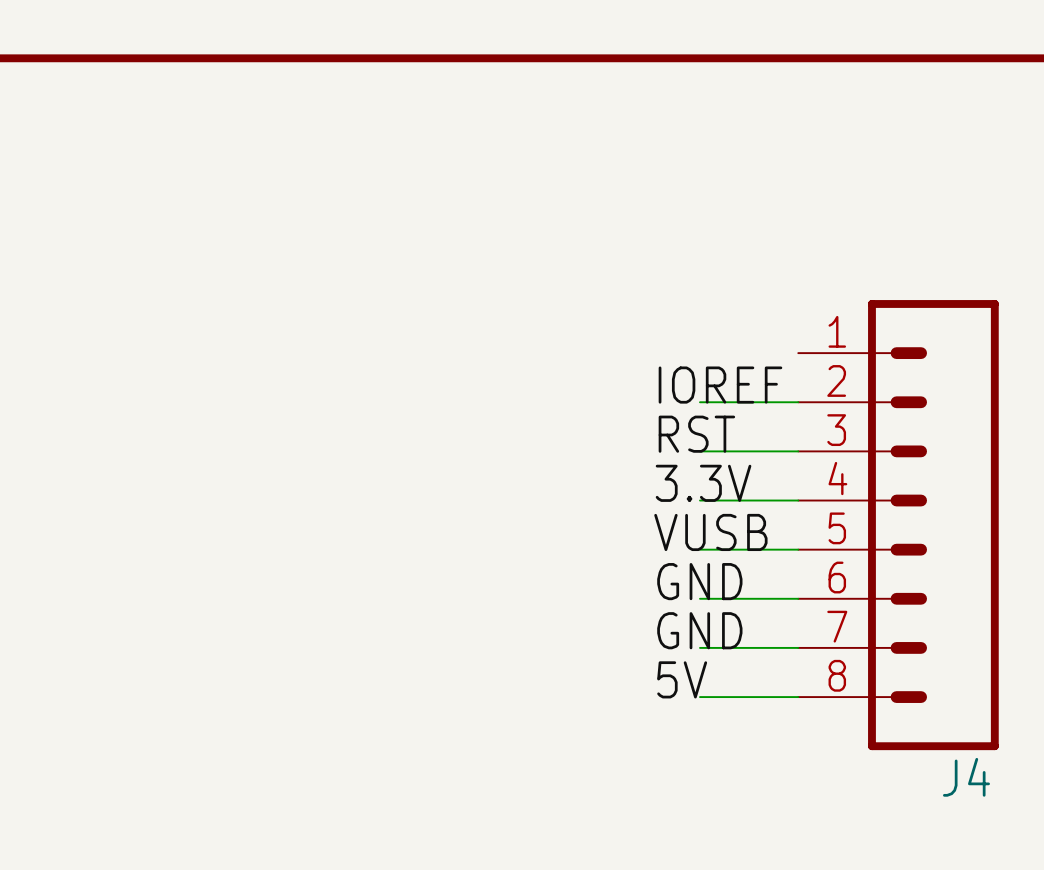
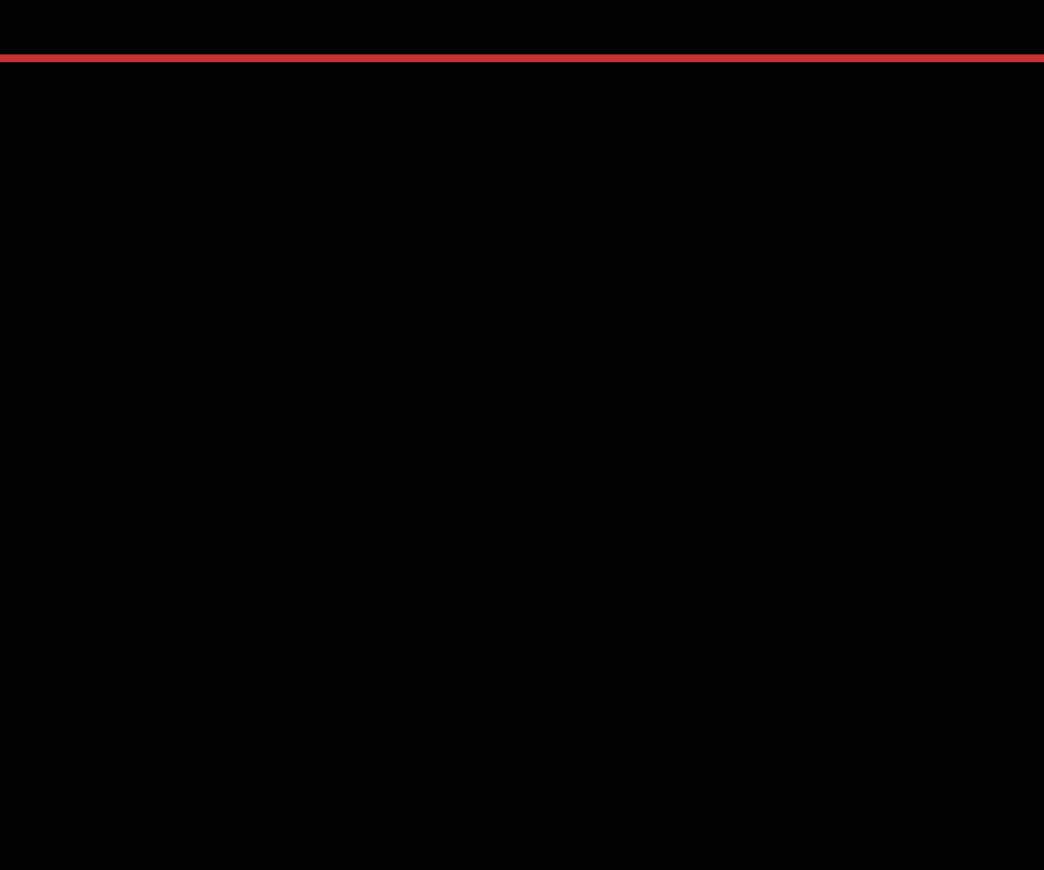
label: IOREF (720, 385) -> none
wire: (700, 402) (798, 402) -> none
label: RST (696, 434) -> none
wire: (700, 451) (798, 451) -> none
label: 3.3V (703, 483) -> none
wire: (700, 500) (798, 500) -> none
J4: (898, 525) -> none
label: VUSB (710, 532) -> none
wire: (700, 549) (798, 549) -> none
label: GND (699, 581) -> none
wire: (700, 598) (798, 598) -> none
label: GND (699, 630) -> none
wire: (700, 647) (798, 647) -> none
label: 5V (682, 679) -> none
wire: (700, 697) (798, 697) -> none

